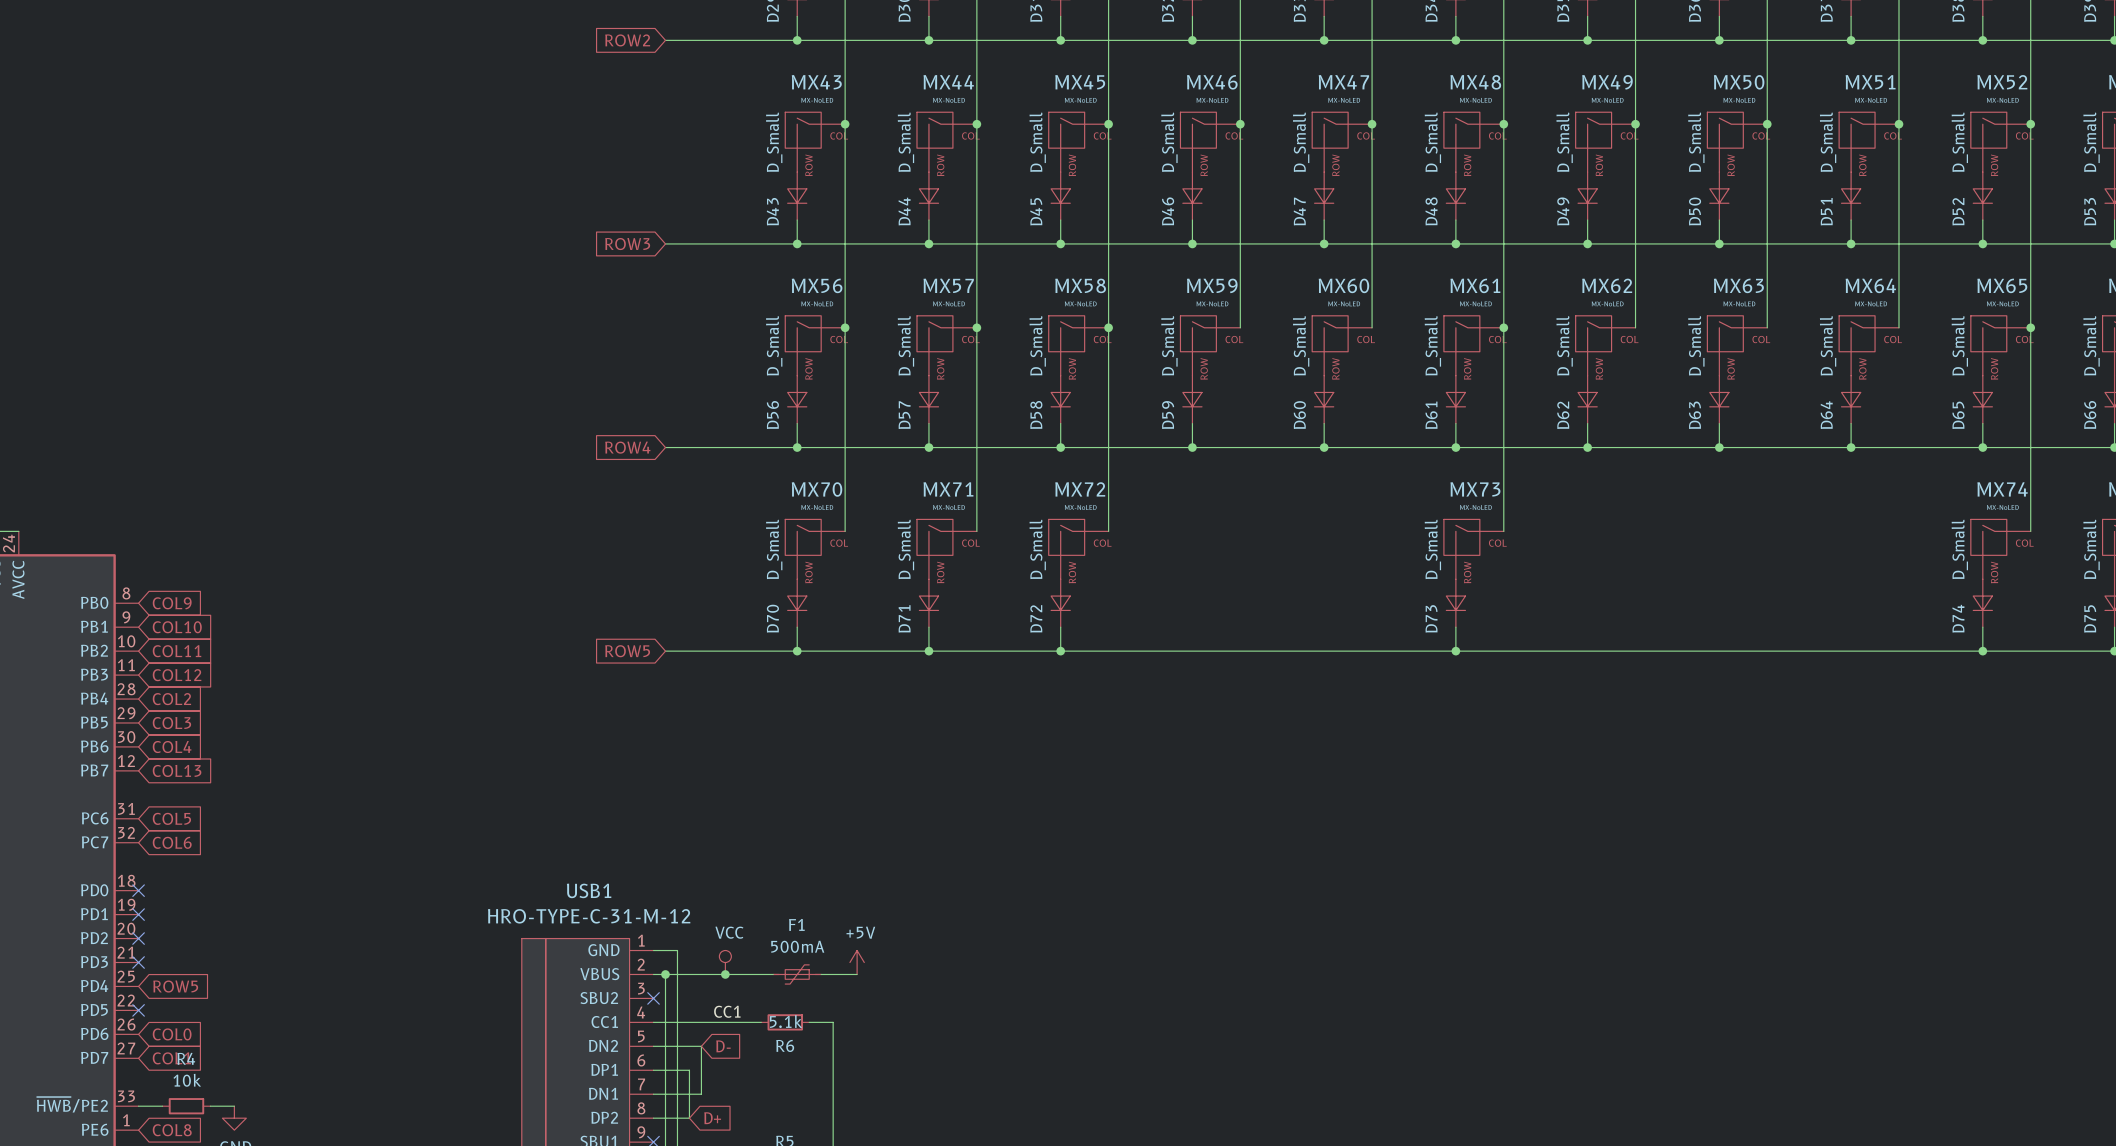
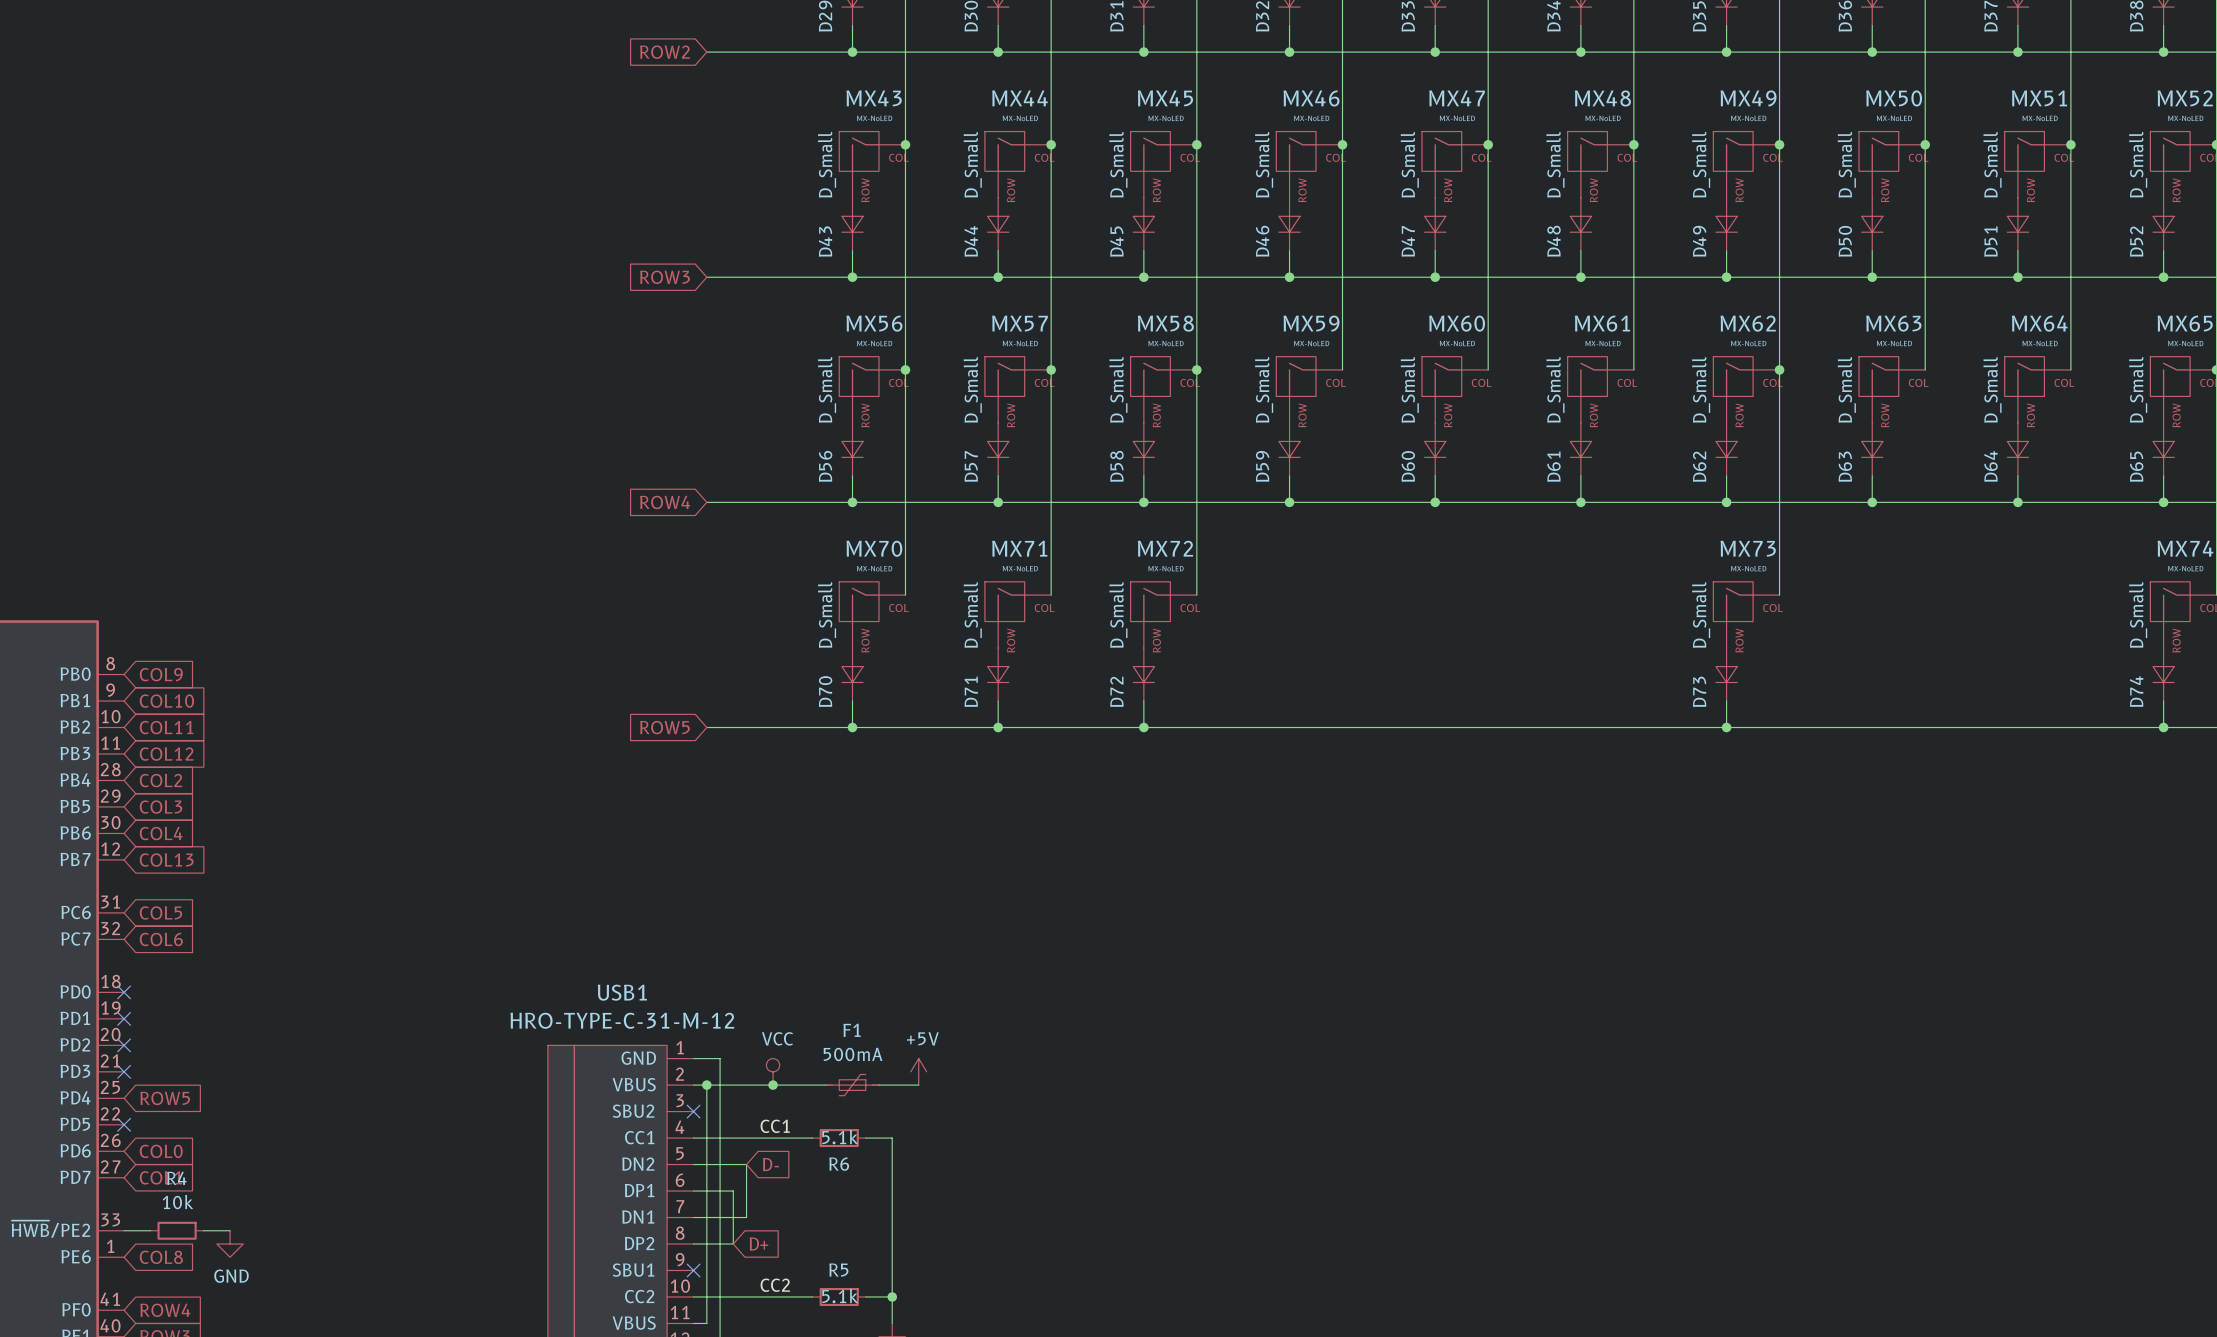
wire: (1503, 327) (1503, 531) -> (1779, 369) (1779, 595)
junction: (1503, 327) -> none
junction: none -> (1779, 369)
MX73 position: (1473, 549) -> (1746, 614)
D73 position: (1455, 603) -> (1726, 674)
wire: (1455, 627) (1455, 651) -> (1726, 701) (1726, 727)
junction: (1455, 651) -> none
junction: none -> (1726, 727)

